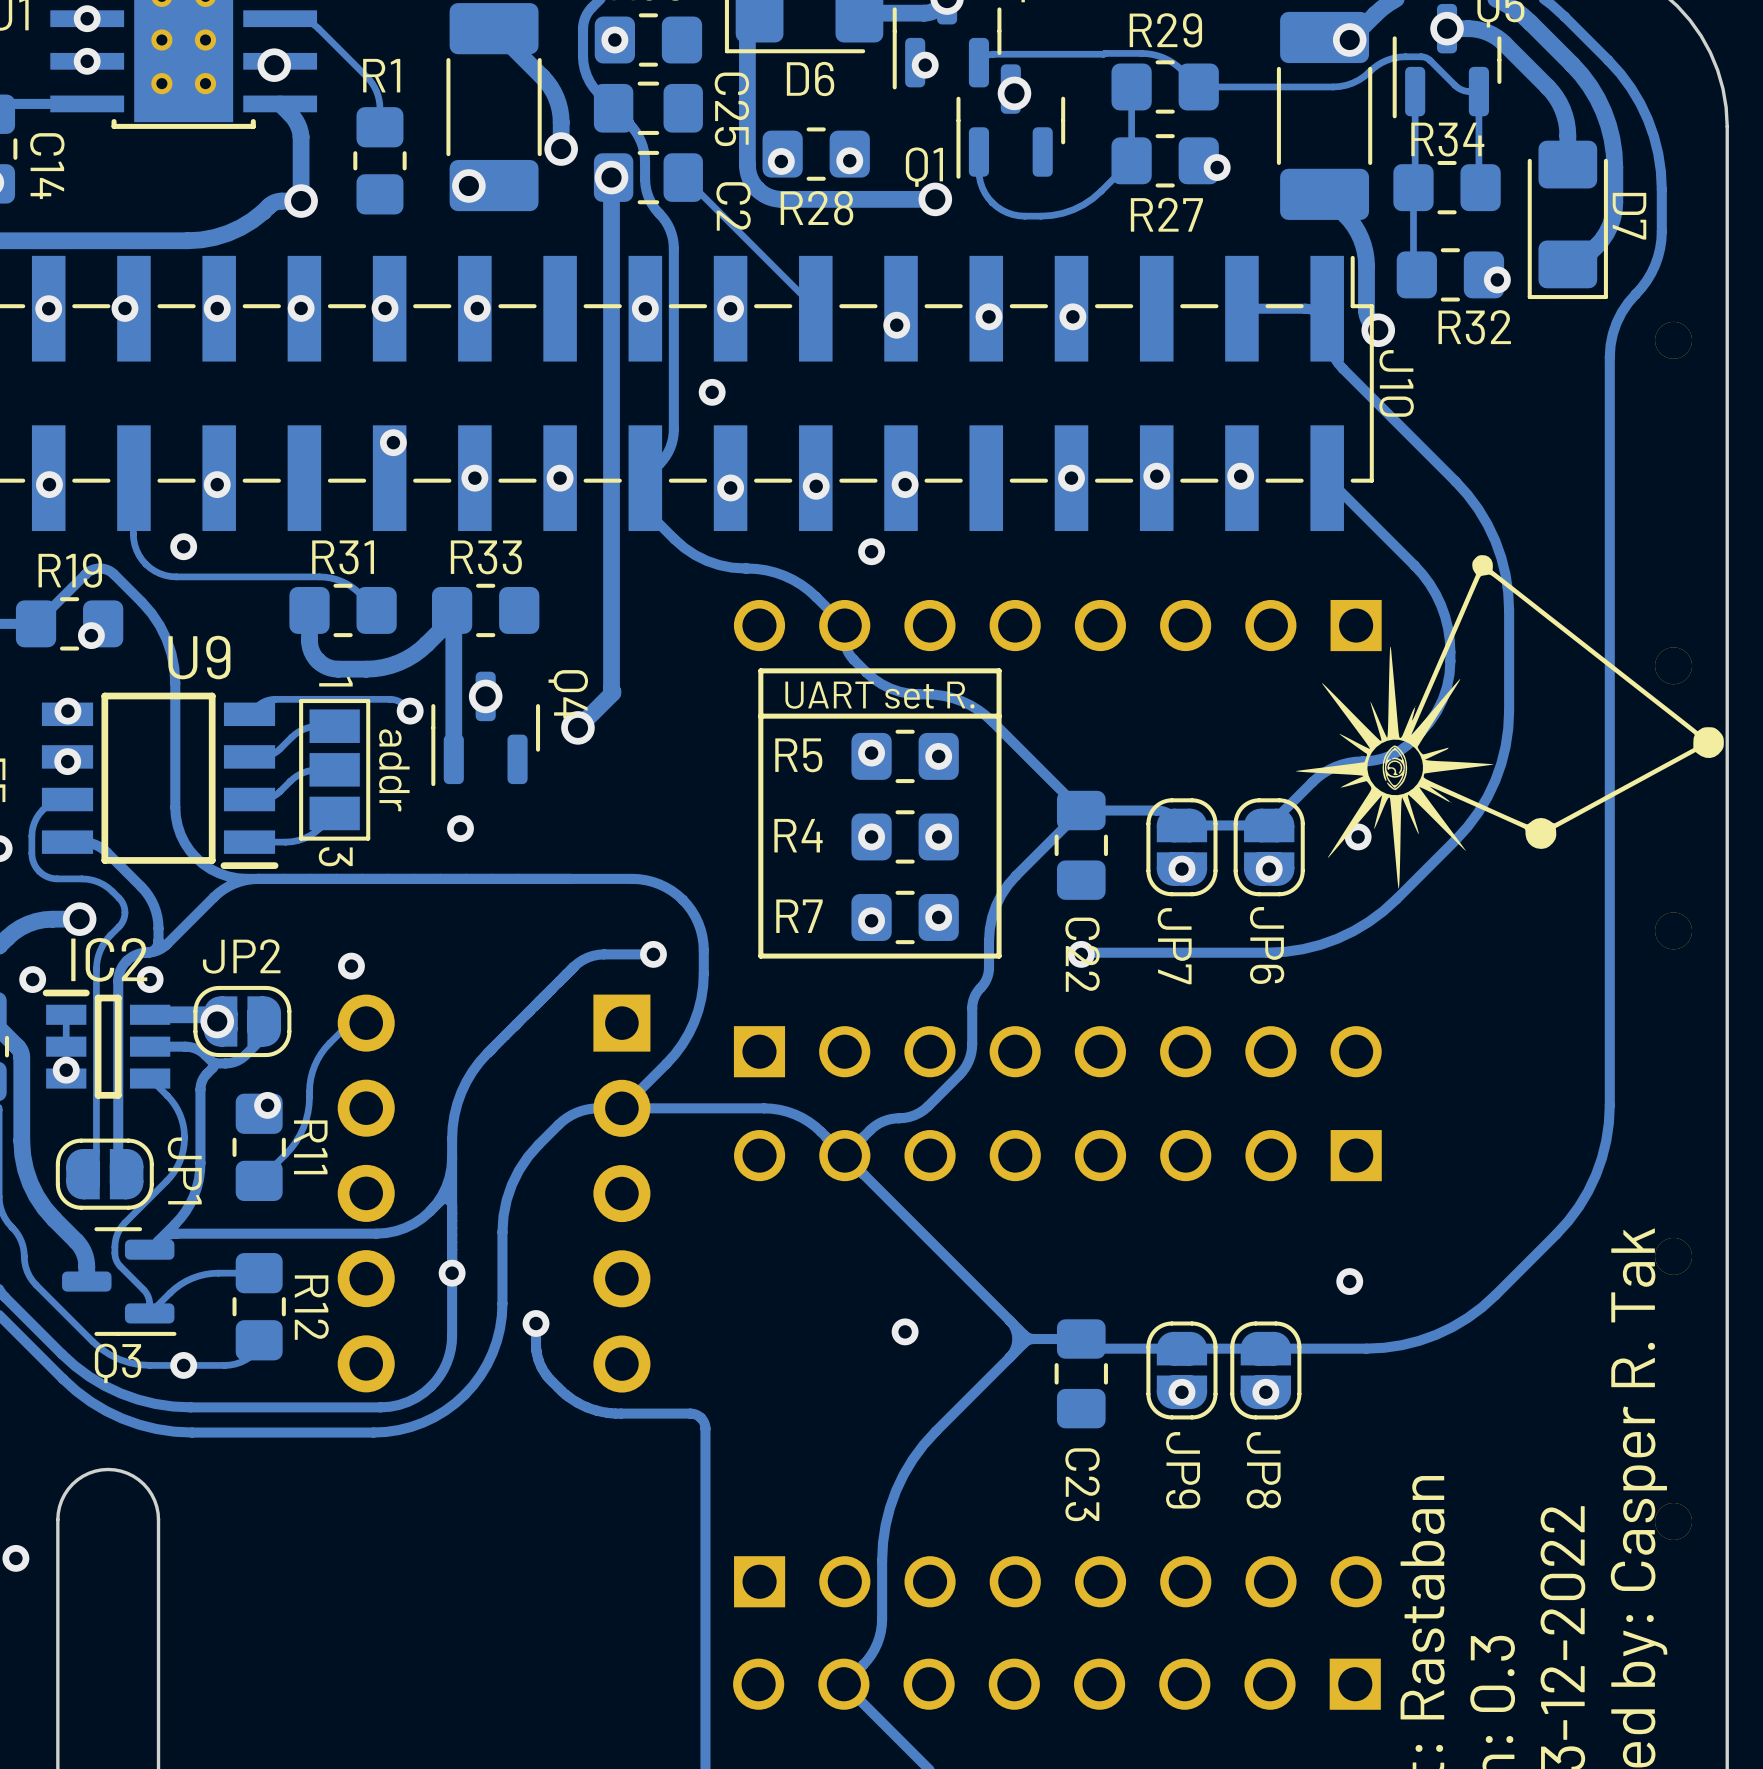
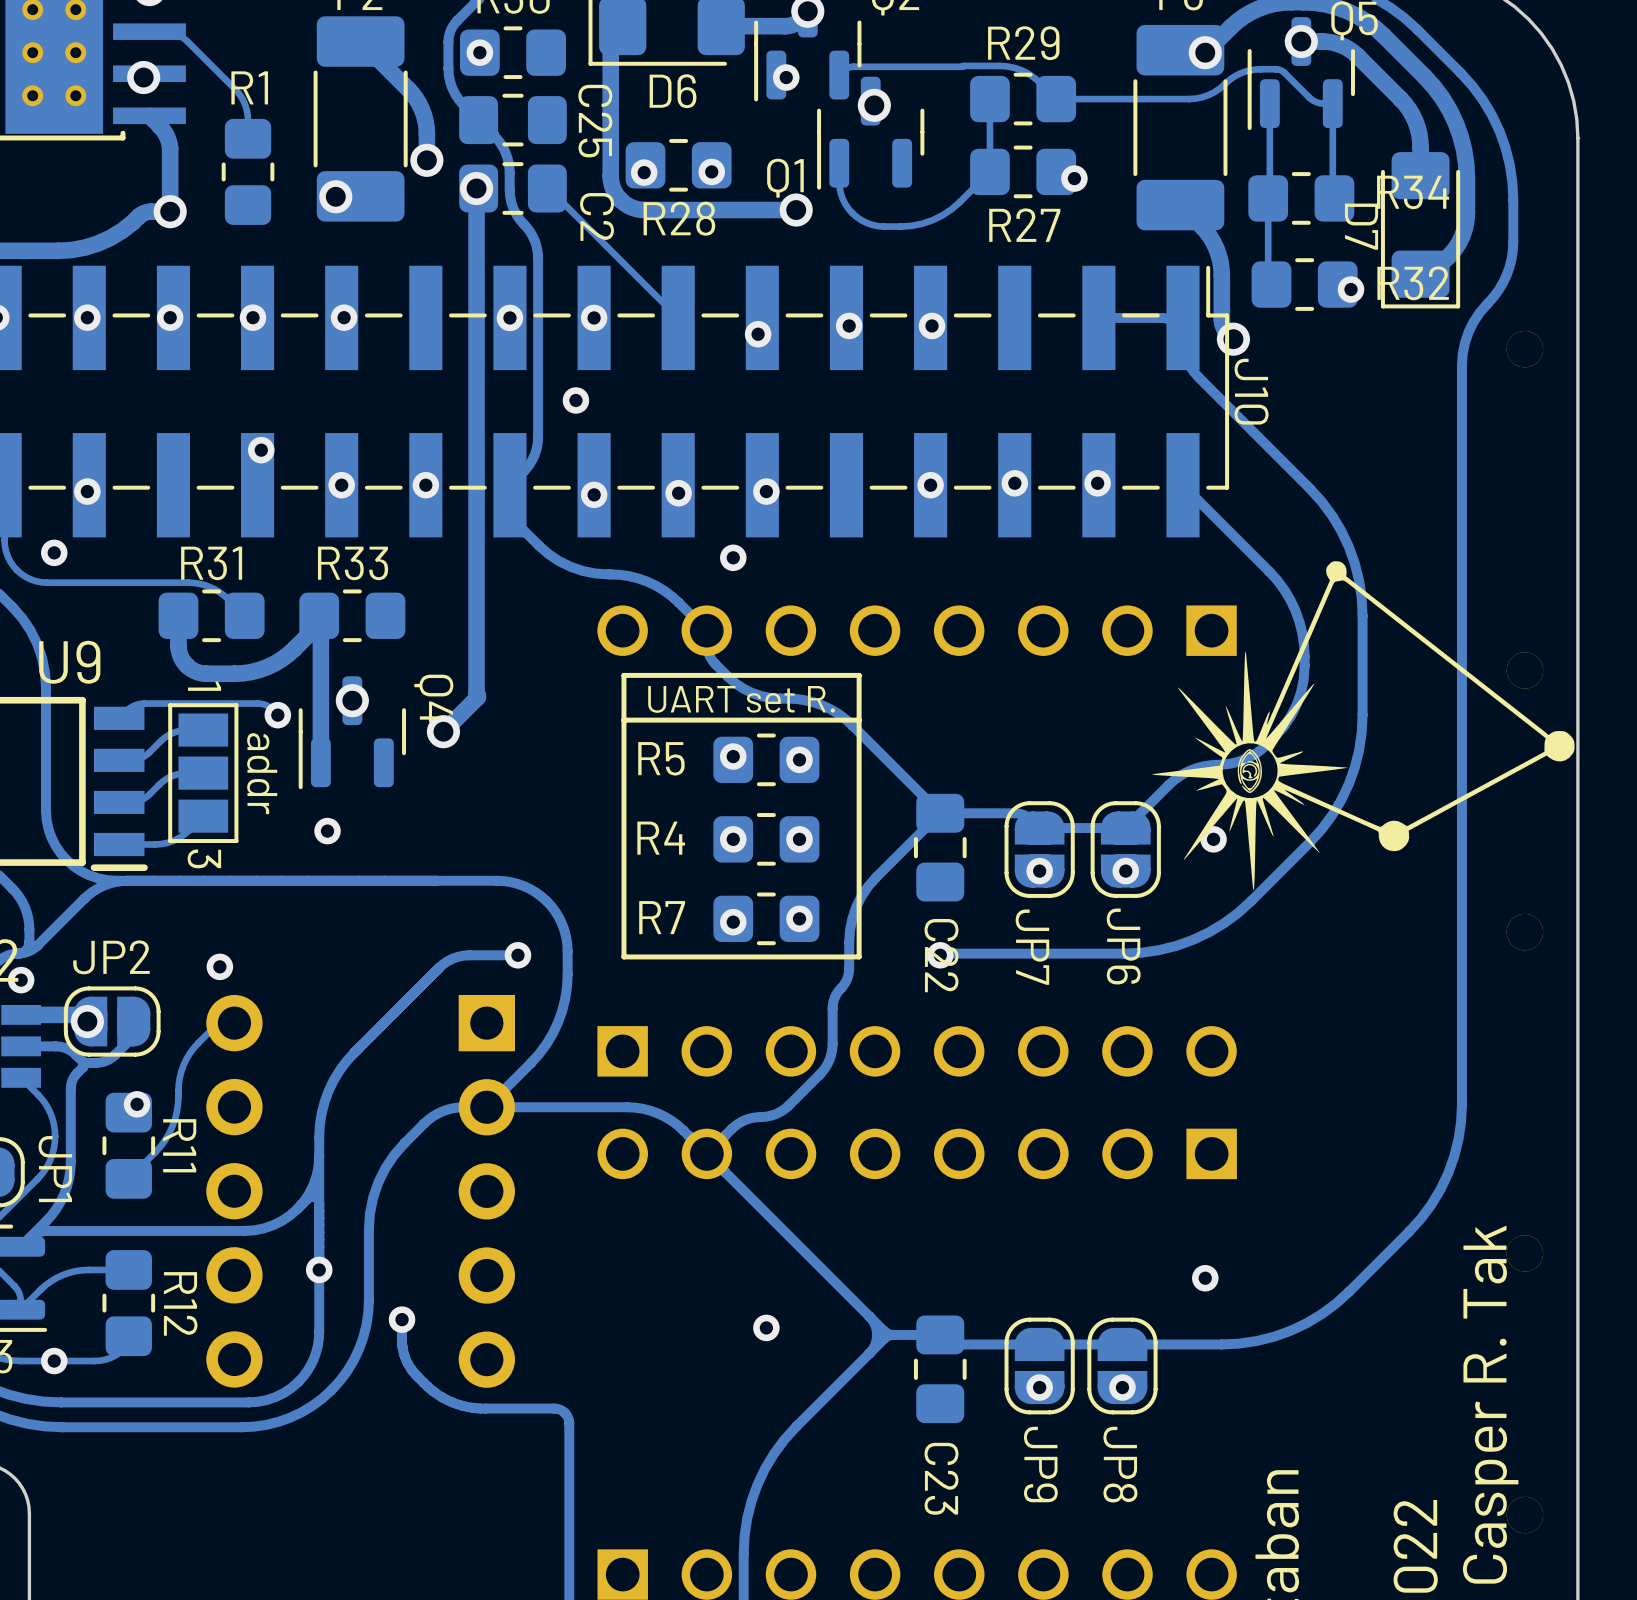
R34 name position: R34 (1447, 139) -> R34 (1413, 192)
D7 name position: D7 (1629, 216) -> D7 (1361, 226)
R32 name position: R32 (1474, 327) -> R32 (1413, 283)

